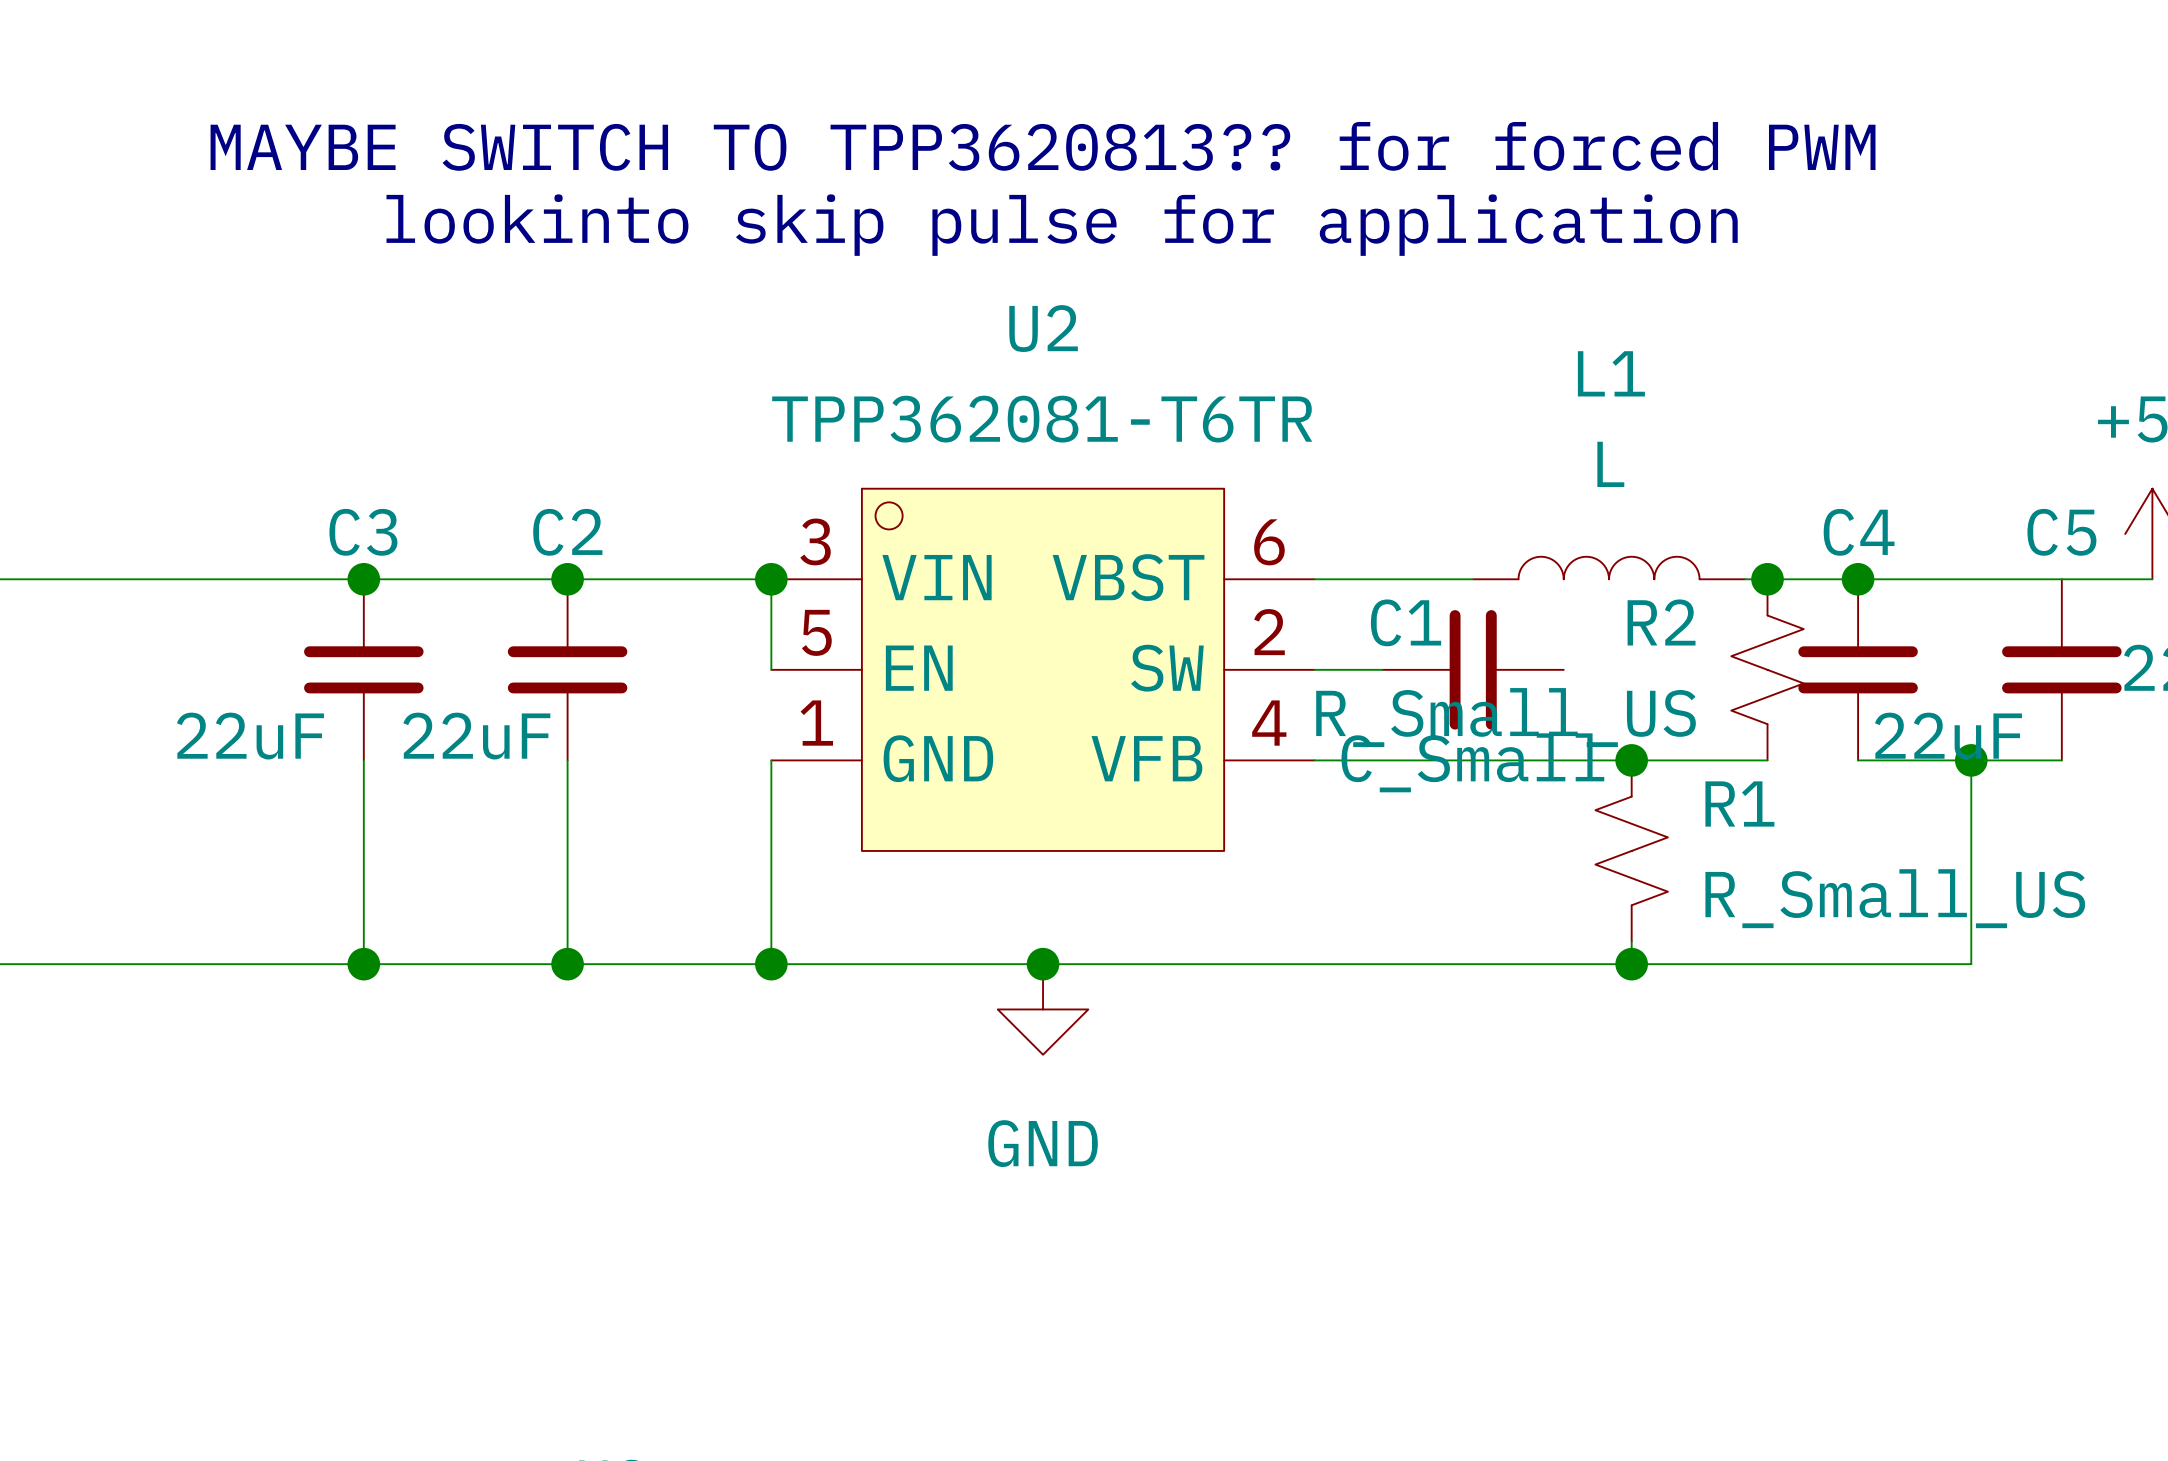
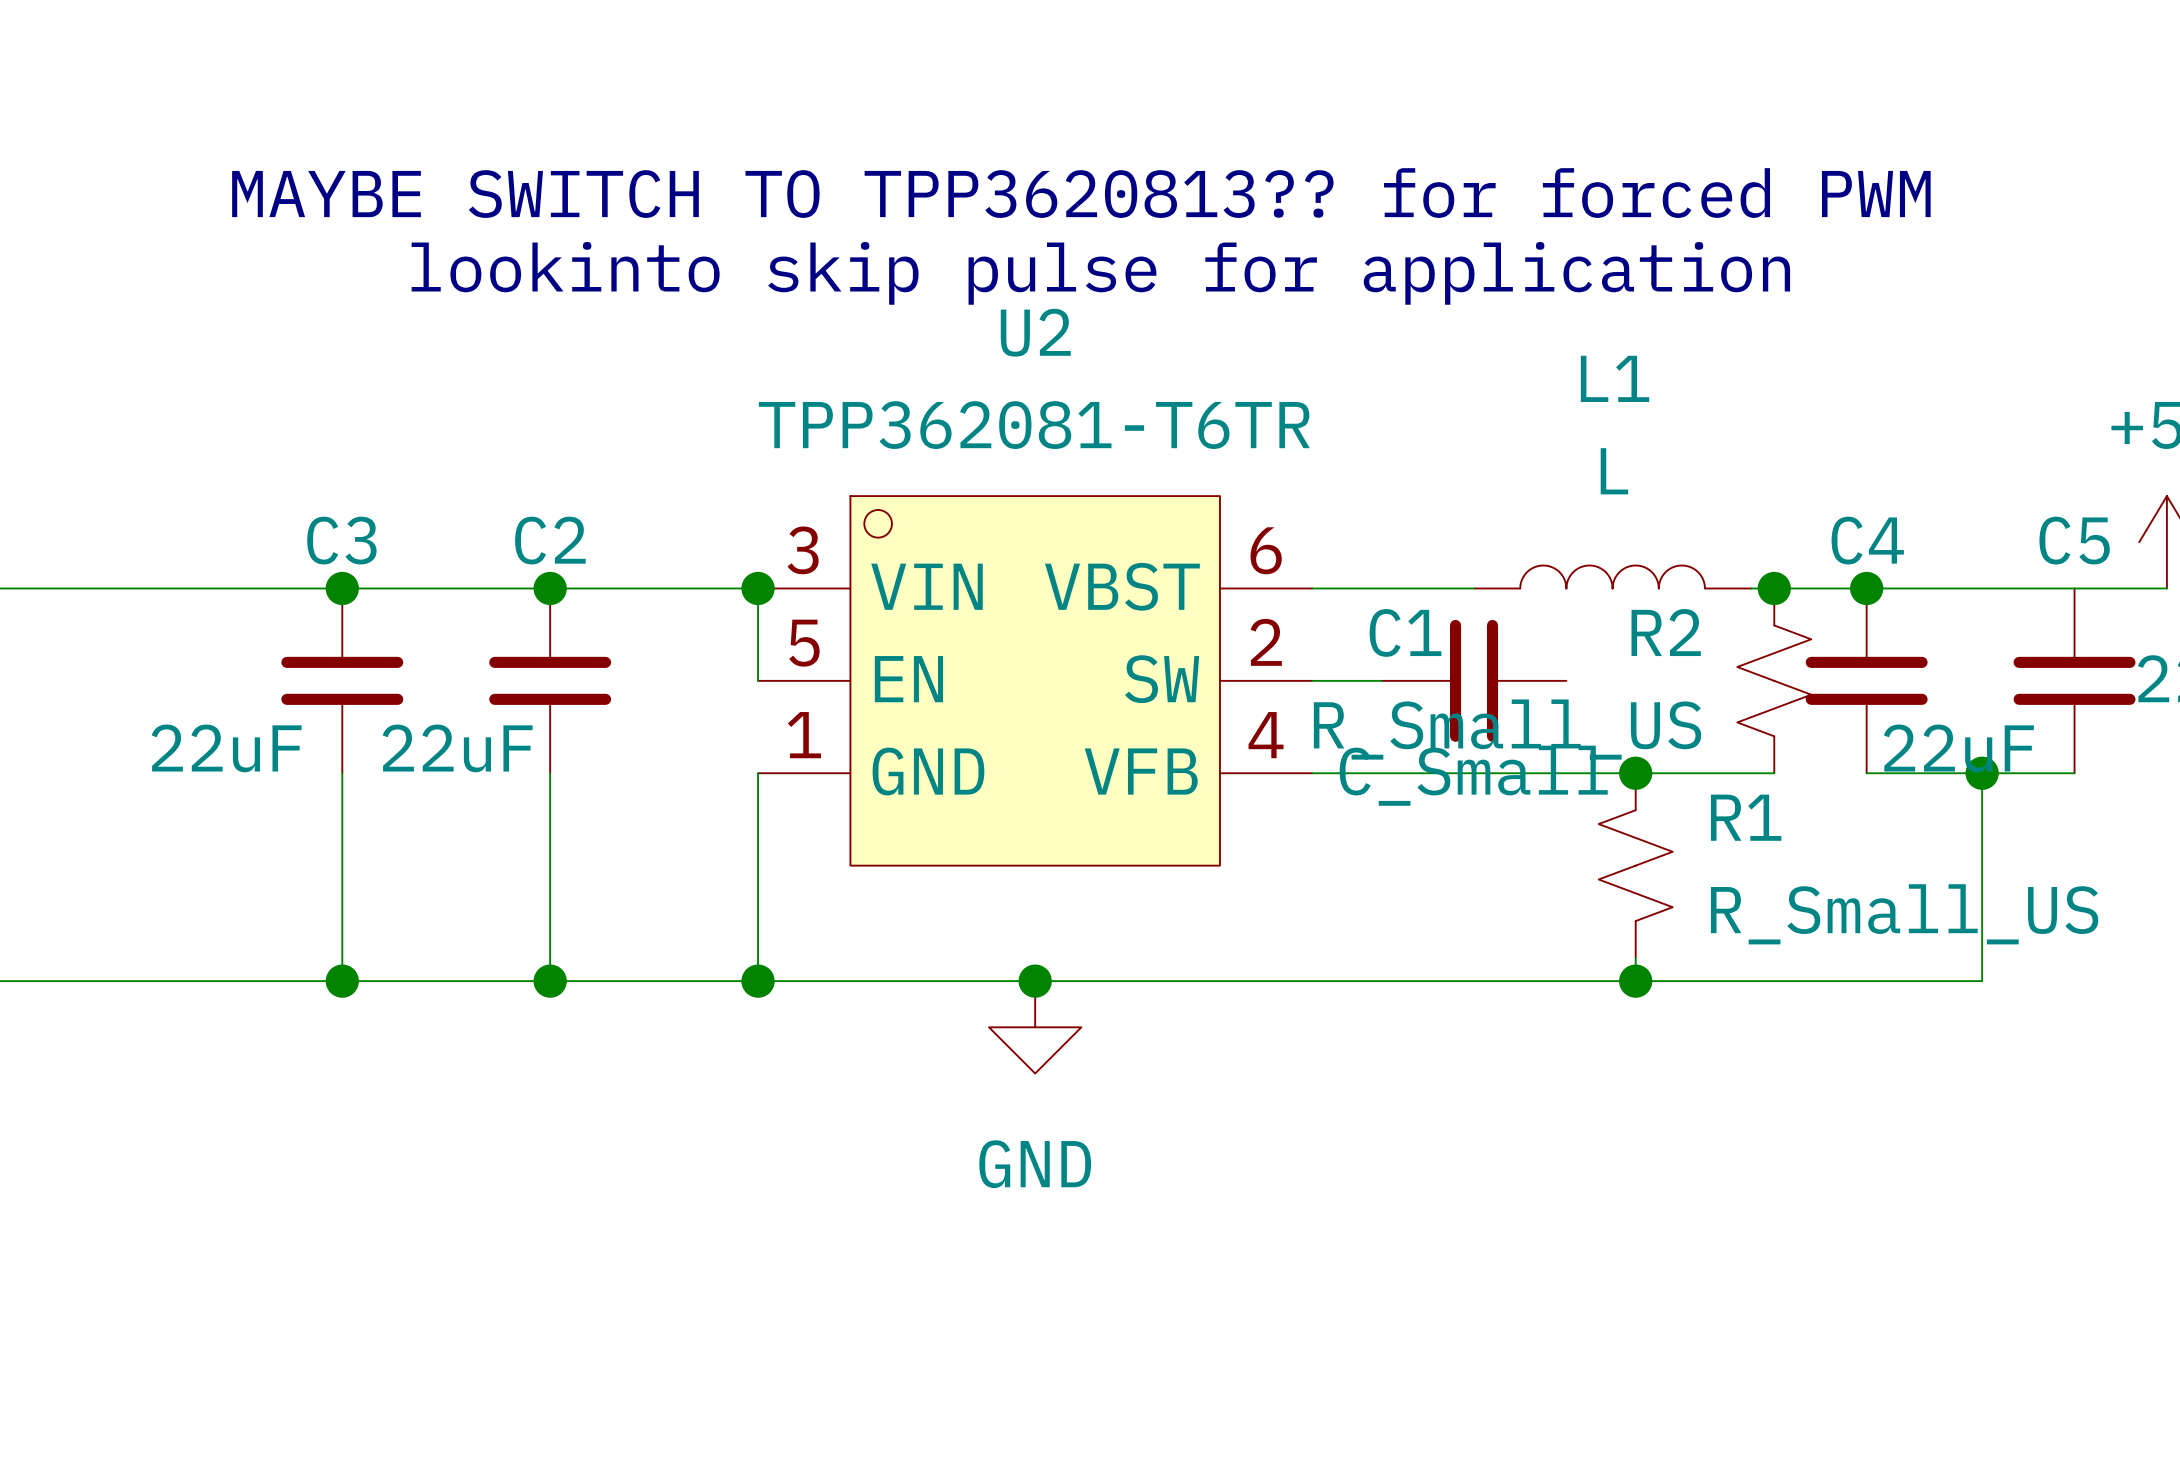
text position: MAYBE SWITCH TO TPP3620813?? for forced PWM (1043, 146) -> MAYBE SWITCH TO TPP3620813?? for forced PWM (1081, 193)
text position: lookinto skip pulse for application (1062, 225) -> lookinto skip pulse for application (1100, 273)

